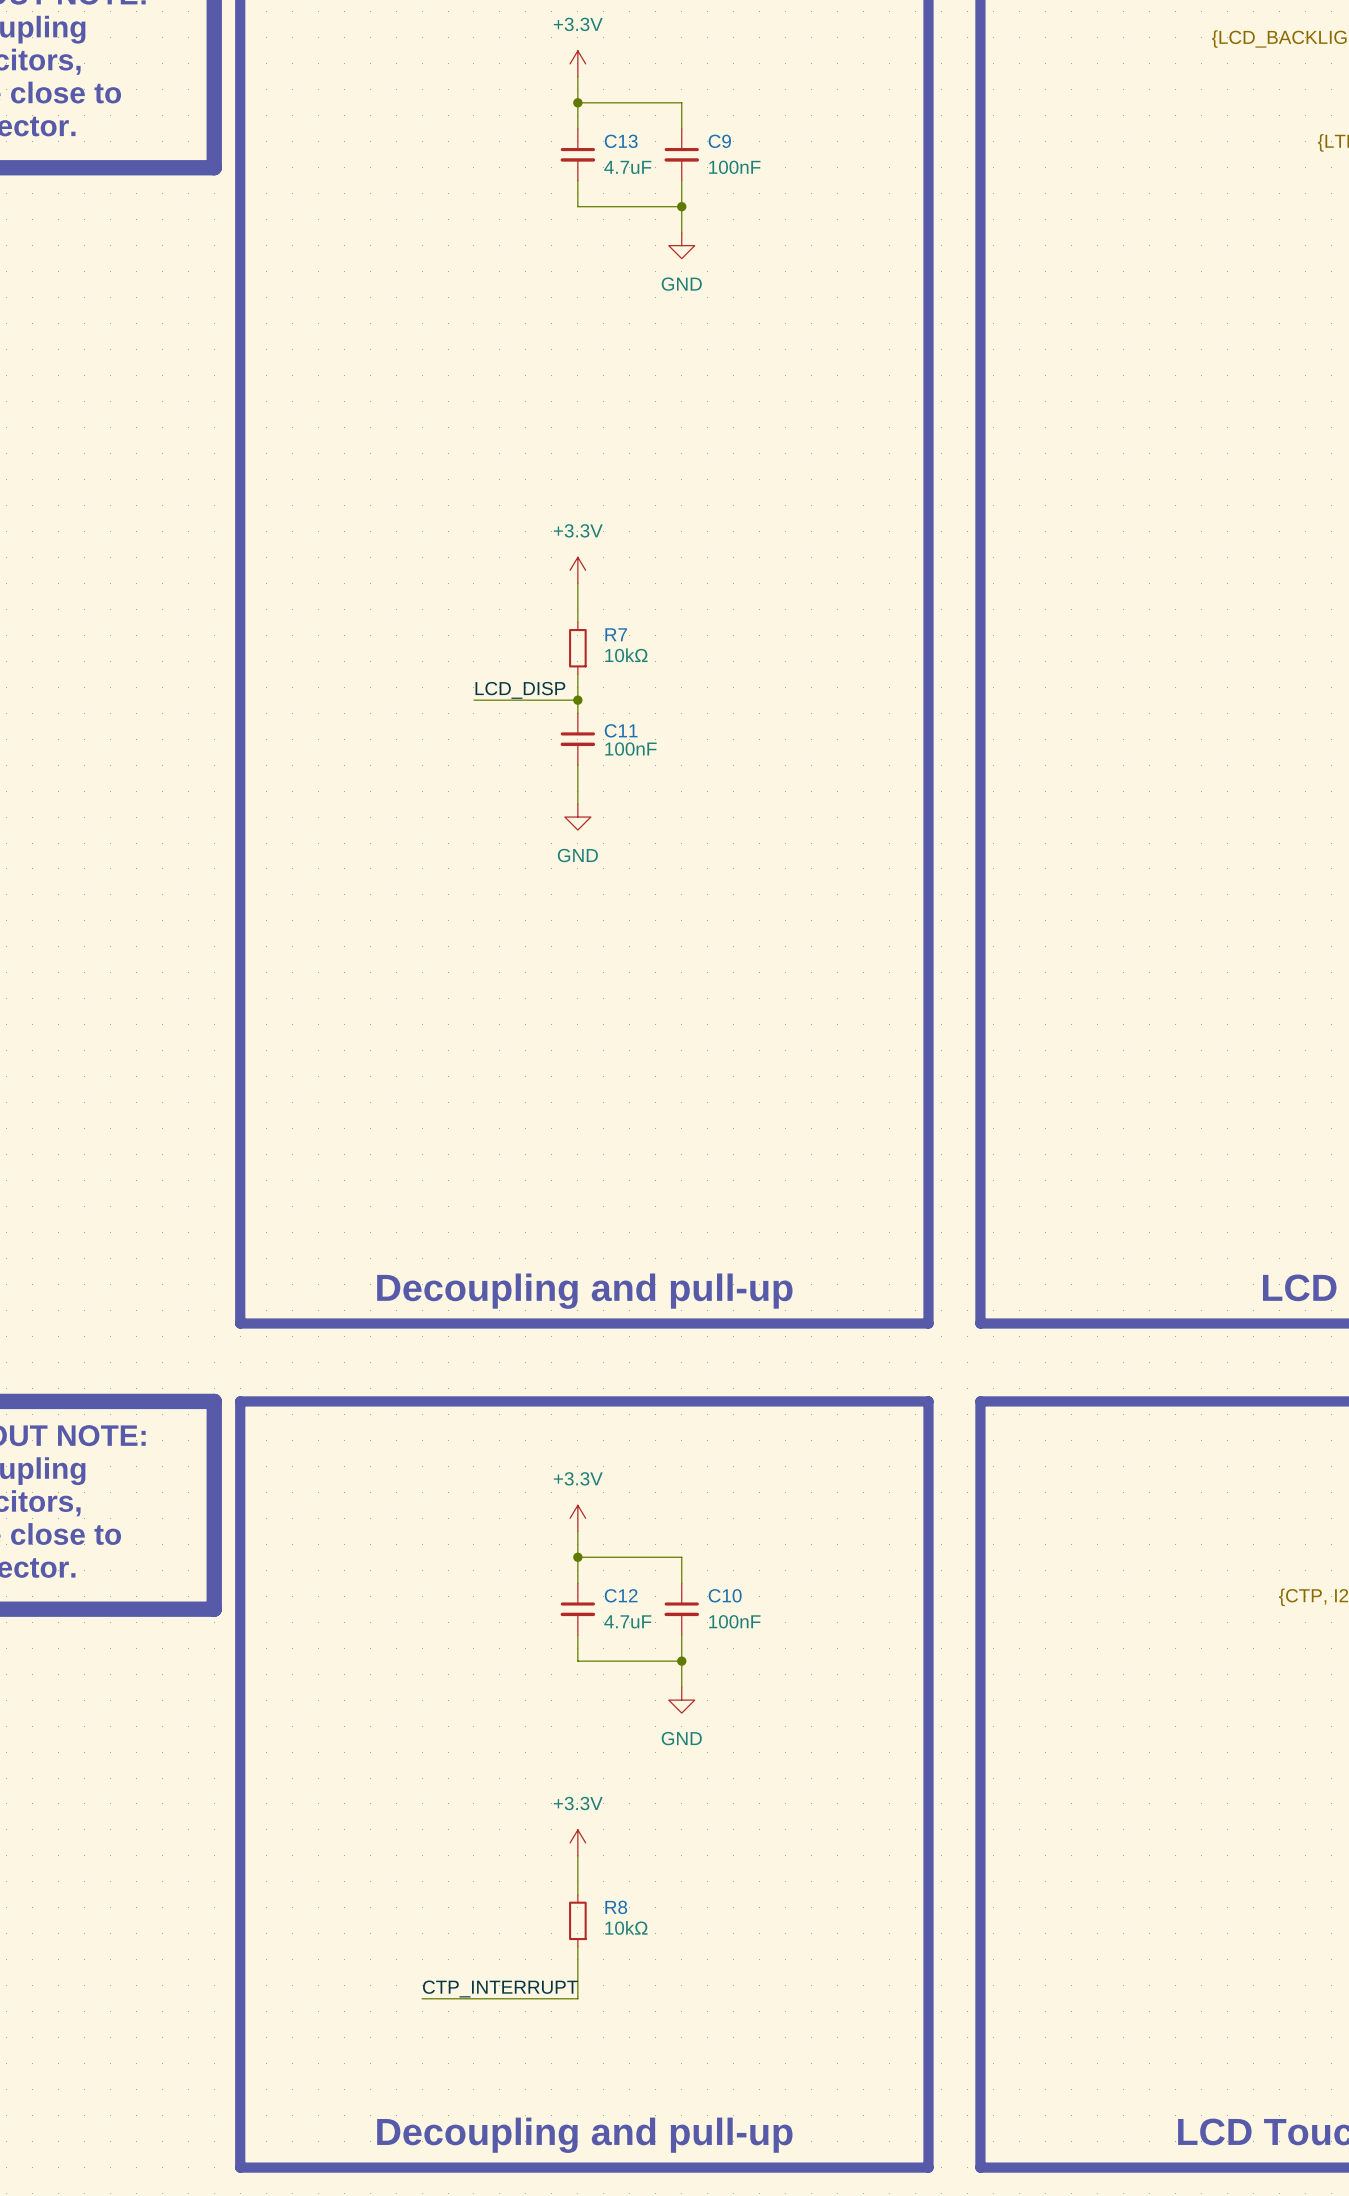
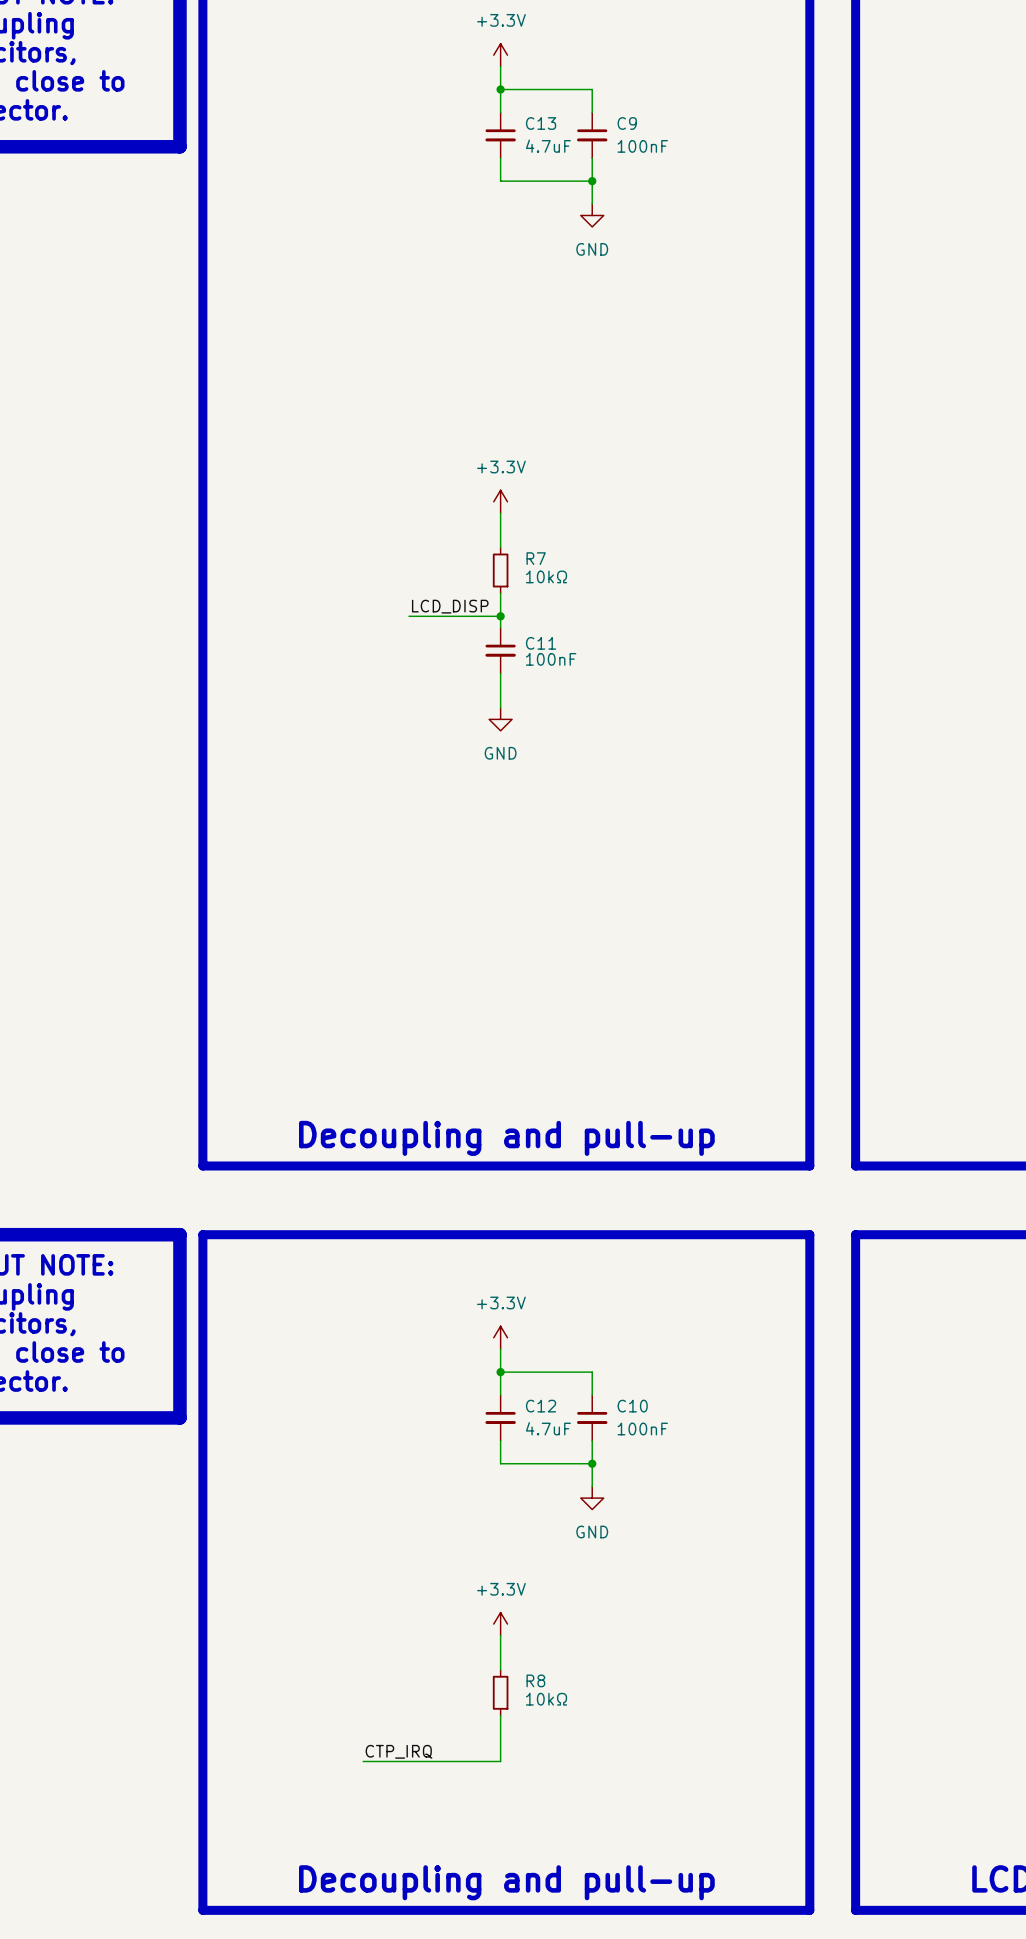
label: CTP_INTERRUPT (500, 1988) -> CTP_IRQ (399, 1751)

